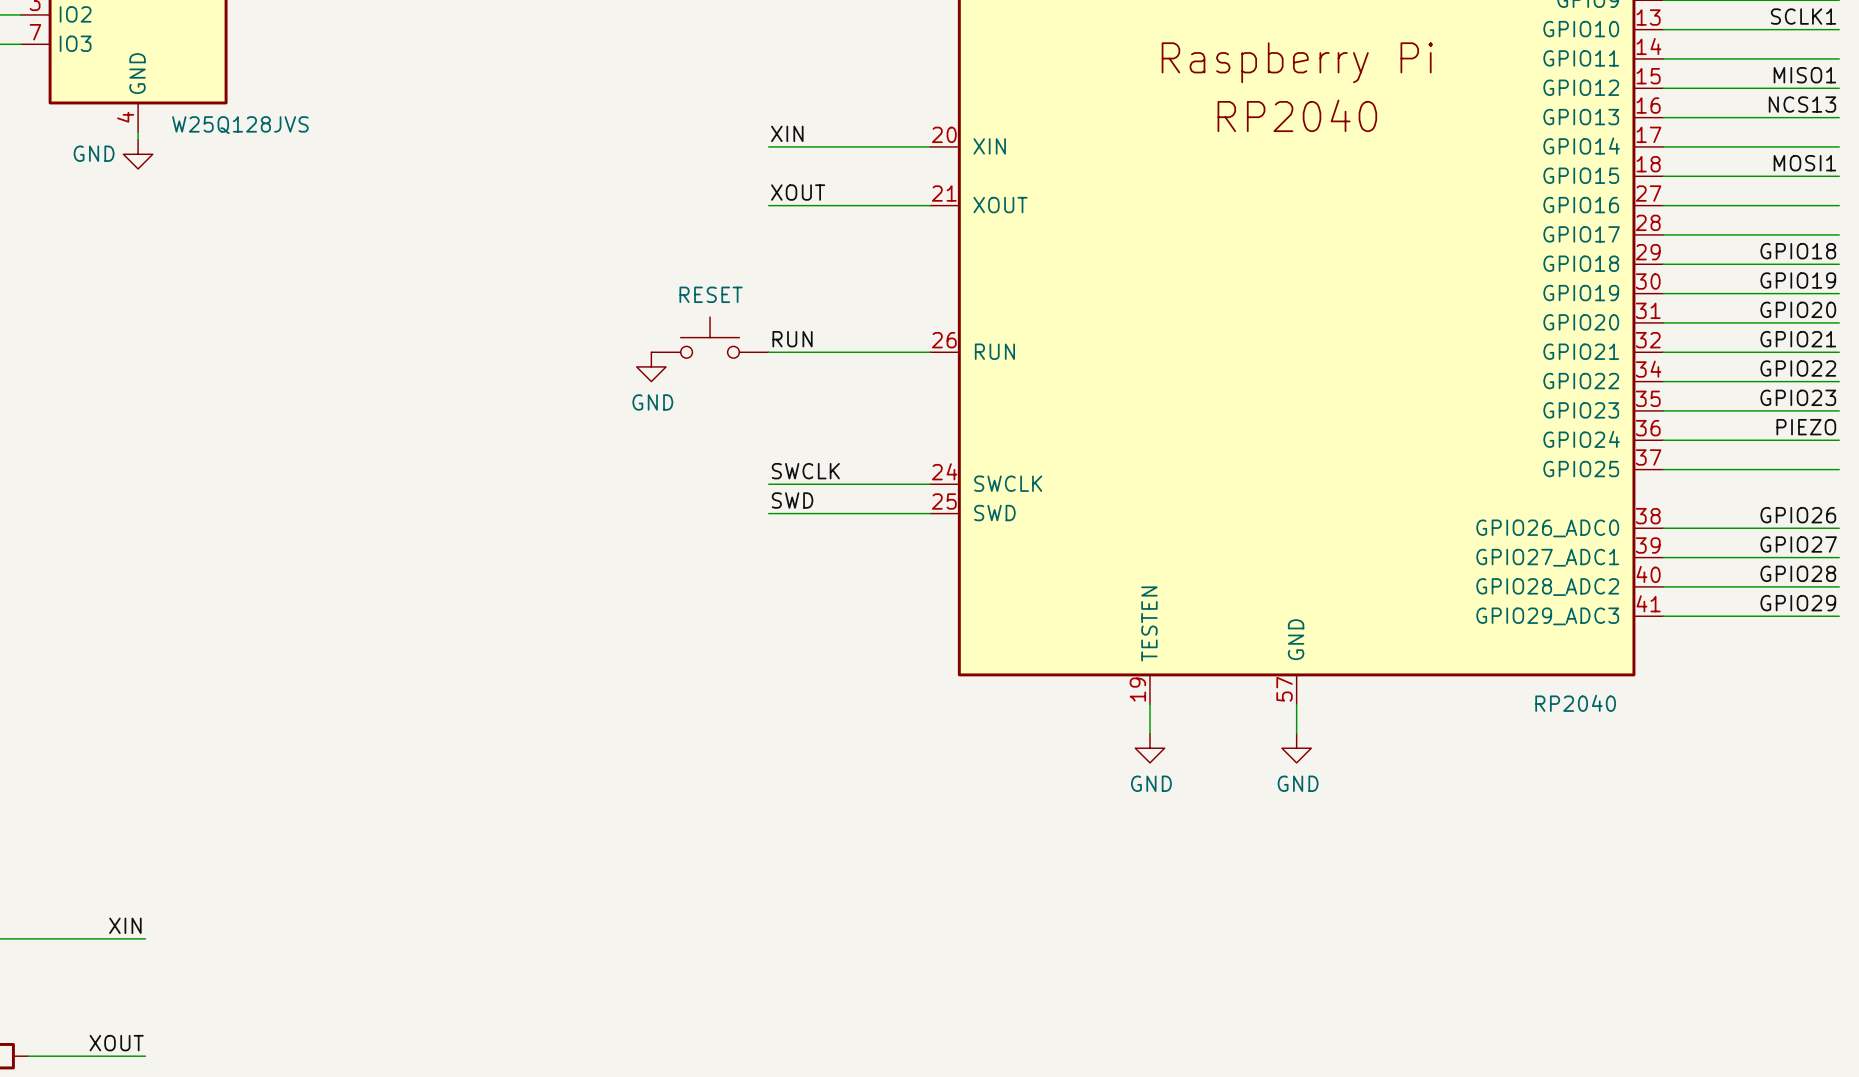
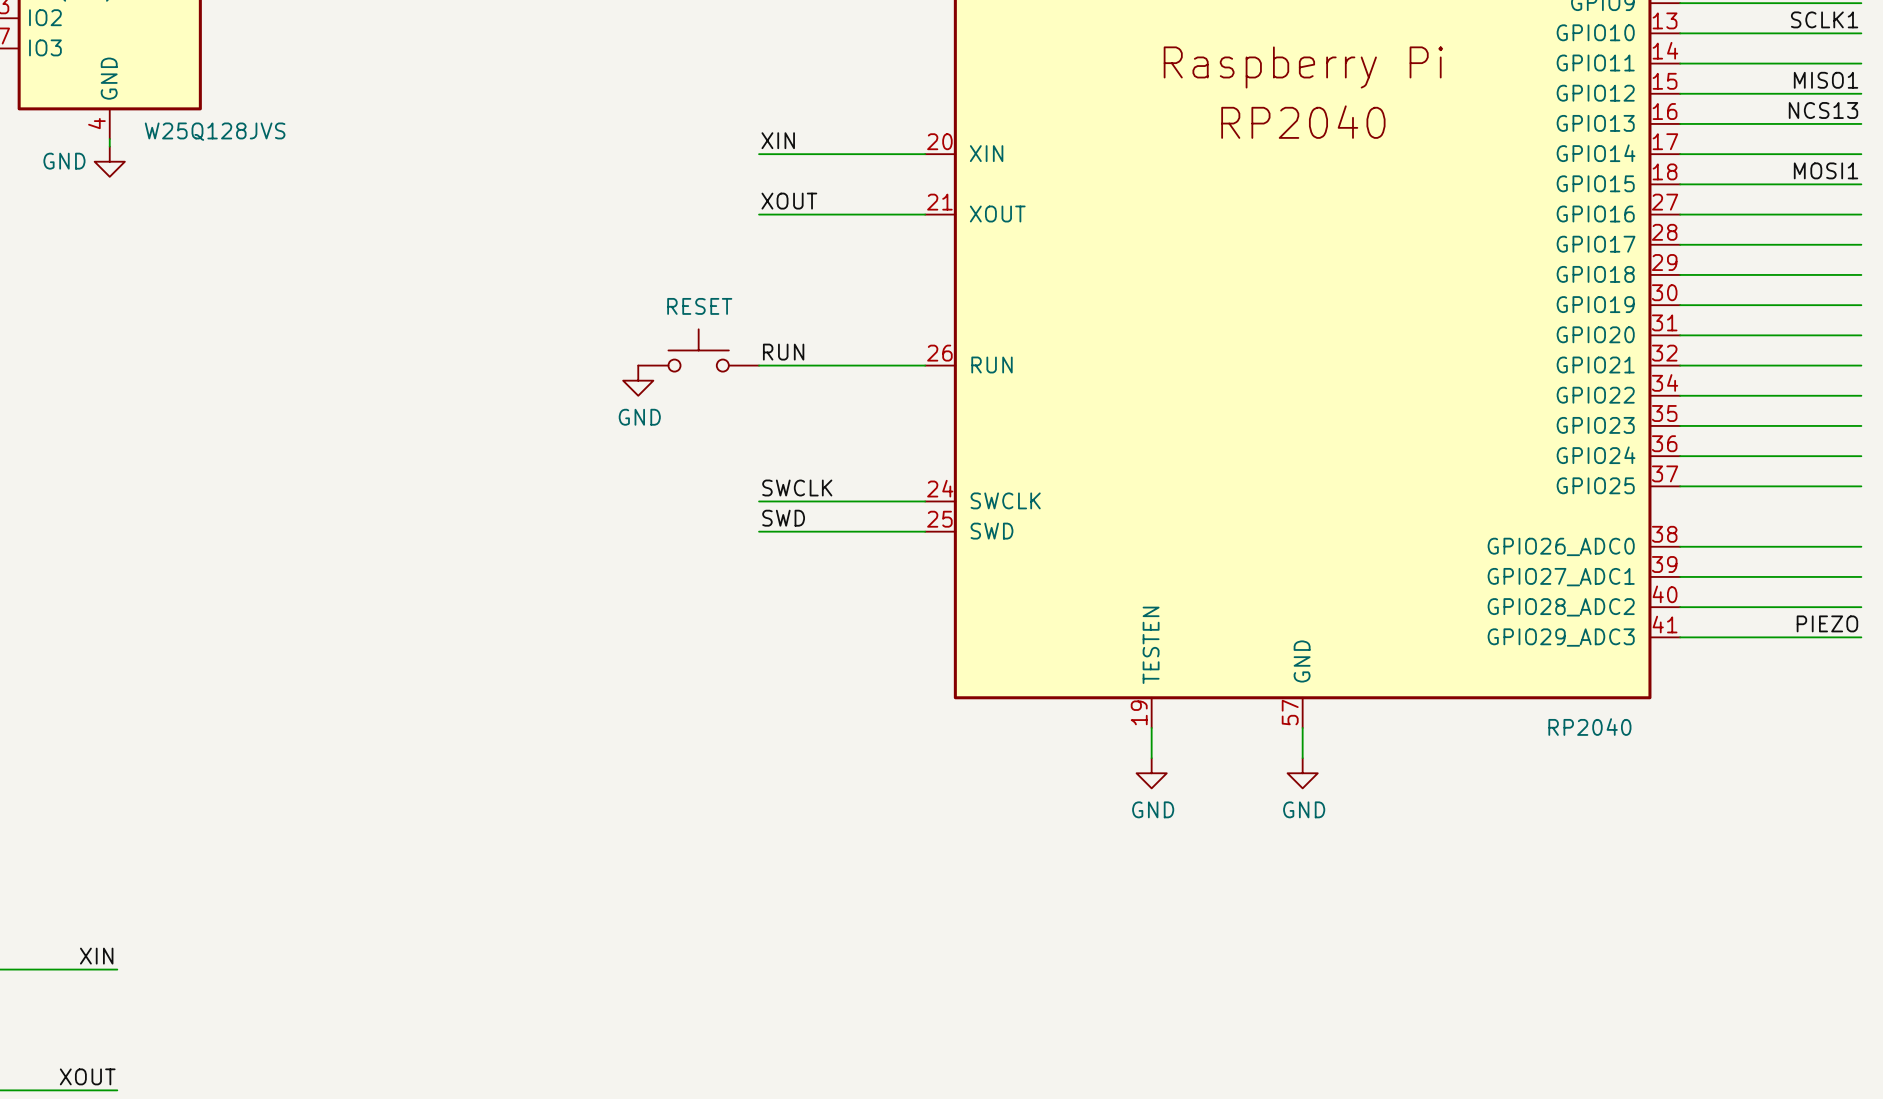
label: GPIO18 (1798, 251) -> none
label: GPIO19 (1798, 280) -> none
label: GPIO20 (1798, 309) -> none
label: GPIO21 (1798, 339) -> none
label: GPIO22 (1798, 368) -> none
label: GPIO23 (1798, 397) -> none
label: PIEZO (1806, 427) -> none
label: GPIO26 (1798, 515) -> none
label: GPIO27 (1798, 544) -> none
label: GPIO28 (1798, 573) -> none
label: GPIO29 (1798, 603) -> PIEZO (1827, 623)

